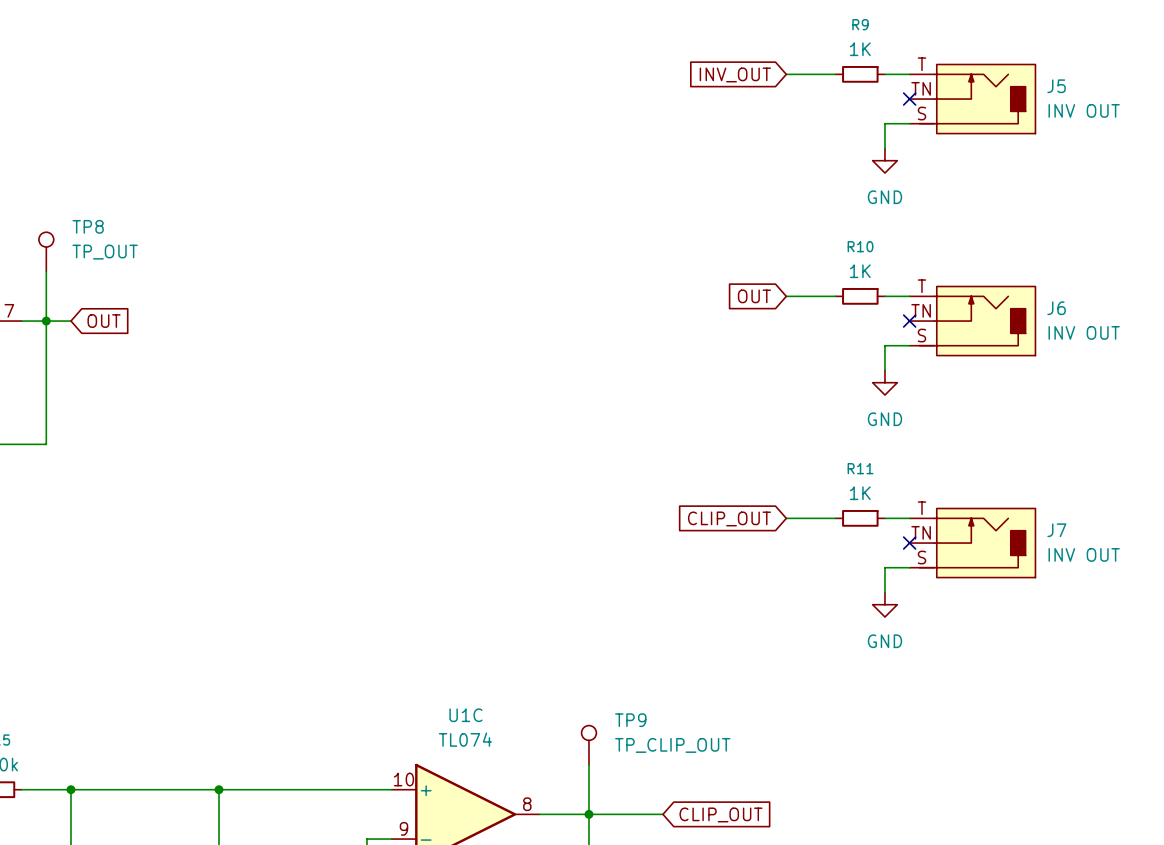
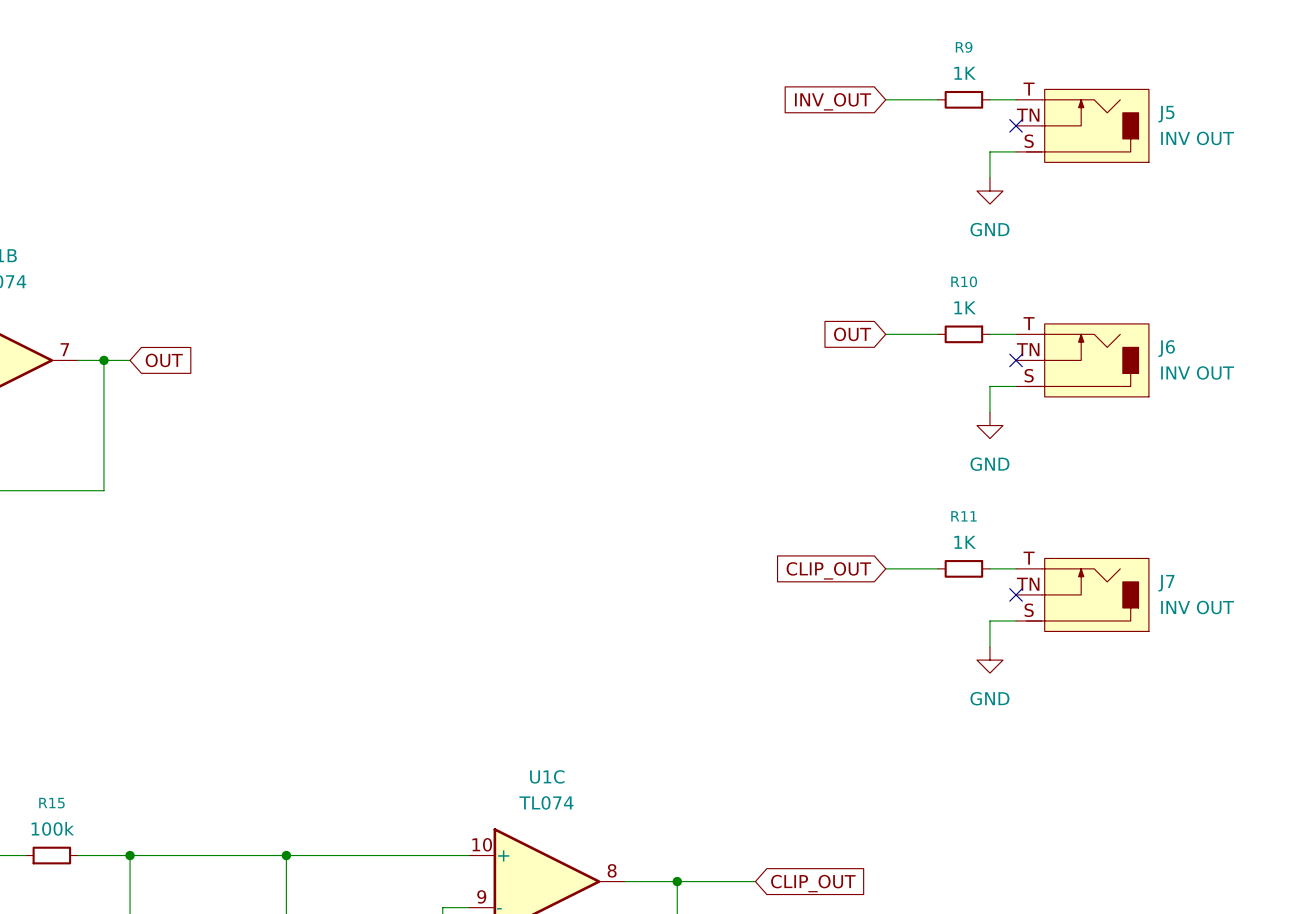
TP8: TP_OUT (46, 251) -> none
wire: (46, 271) (46, 321) -> none
TP9: TP_CLIP_OUT (588, 745) -> none
wire: (588, 765) (588, 814) -> none

